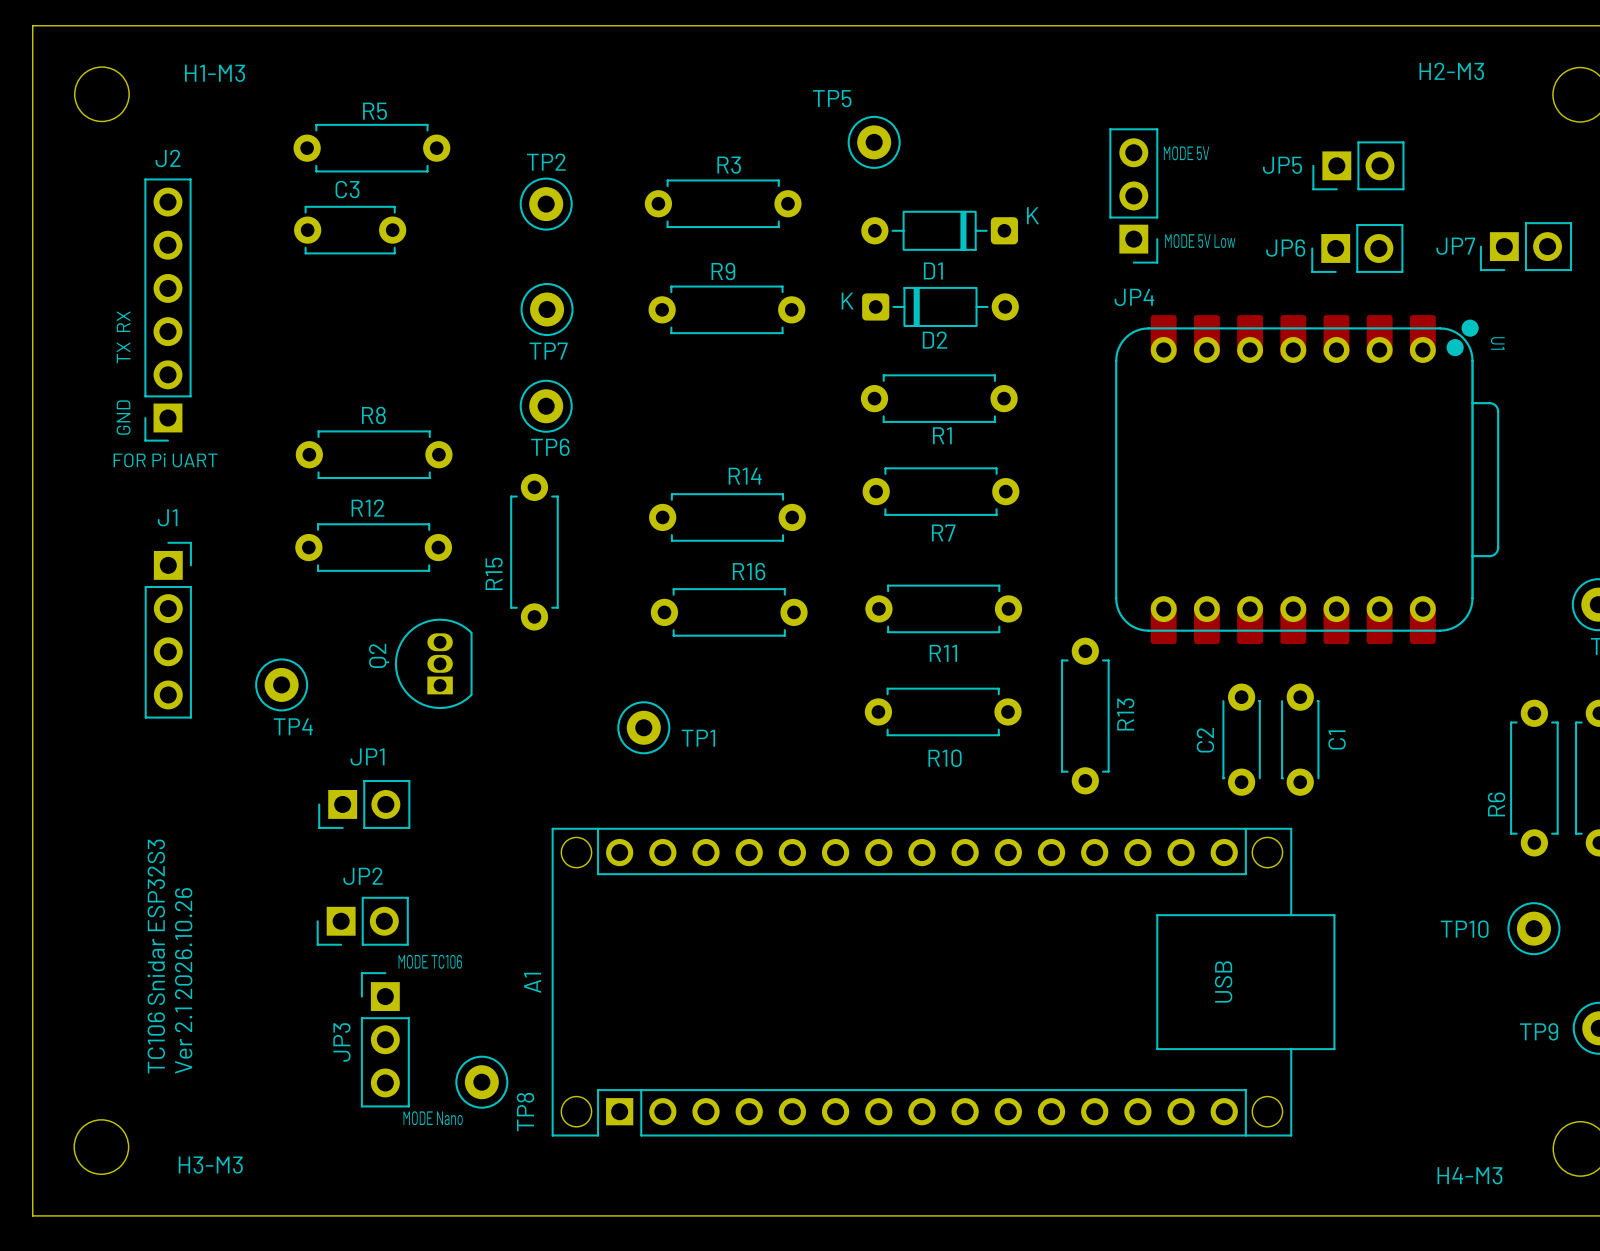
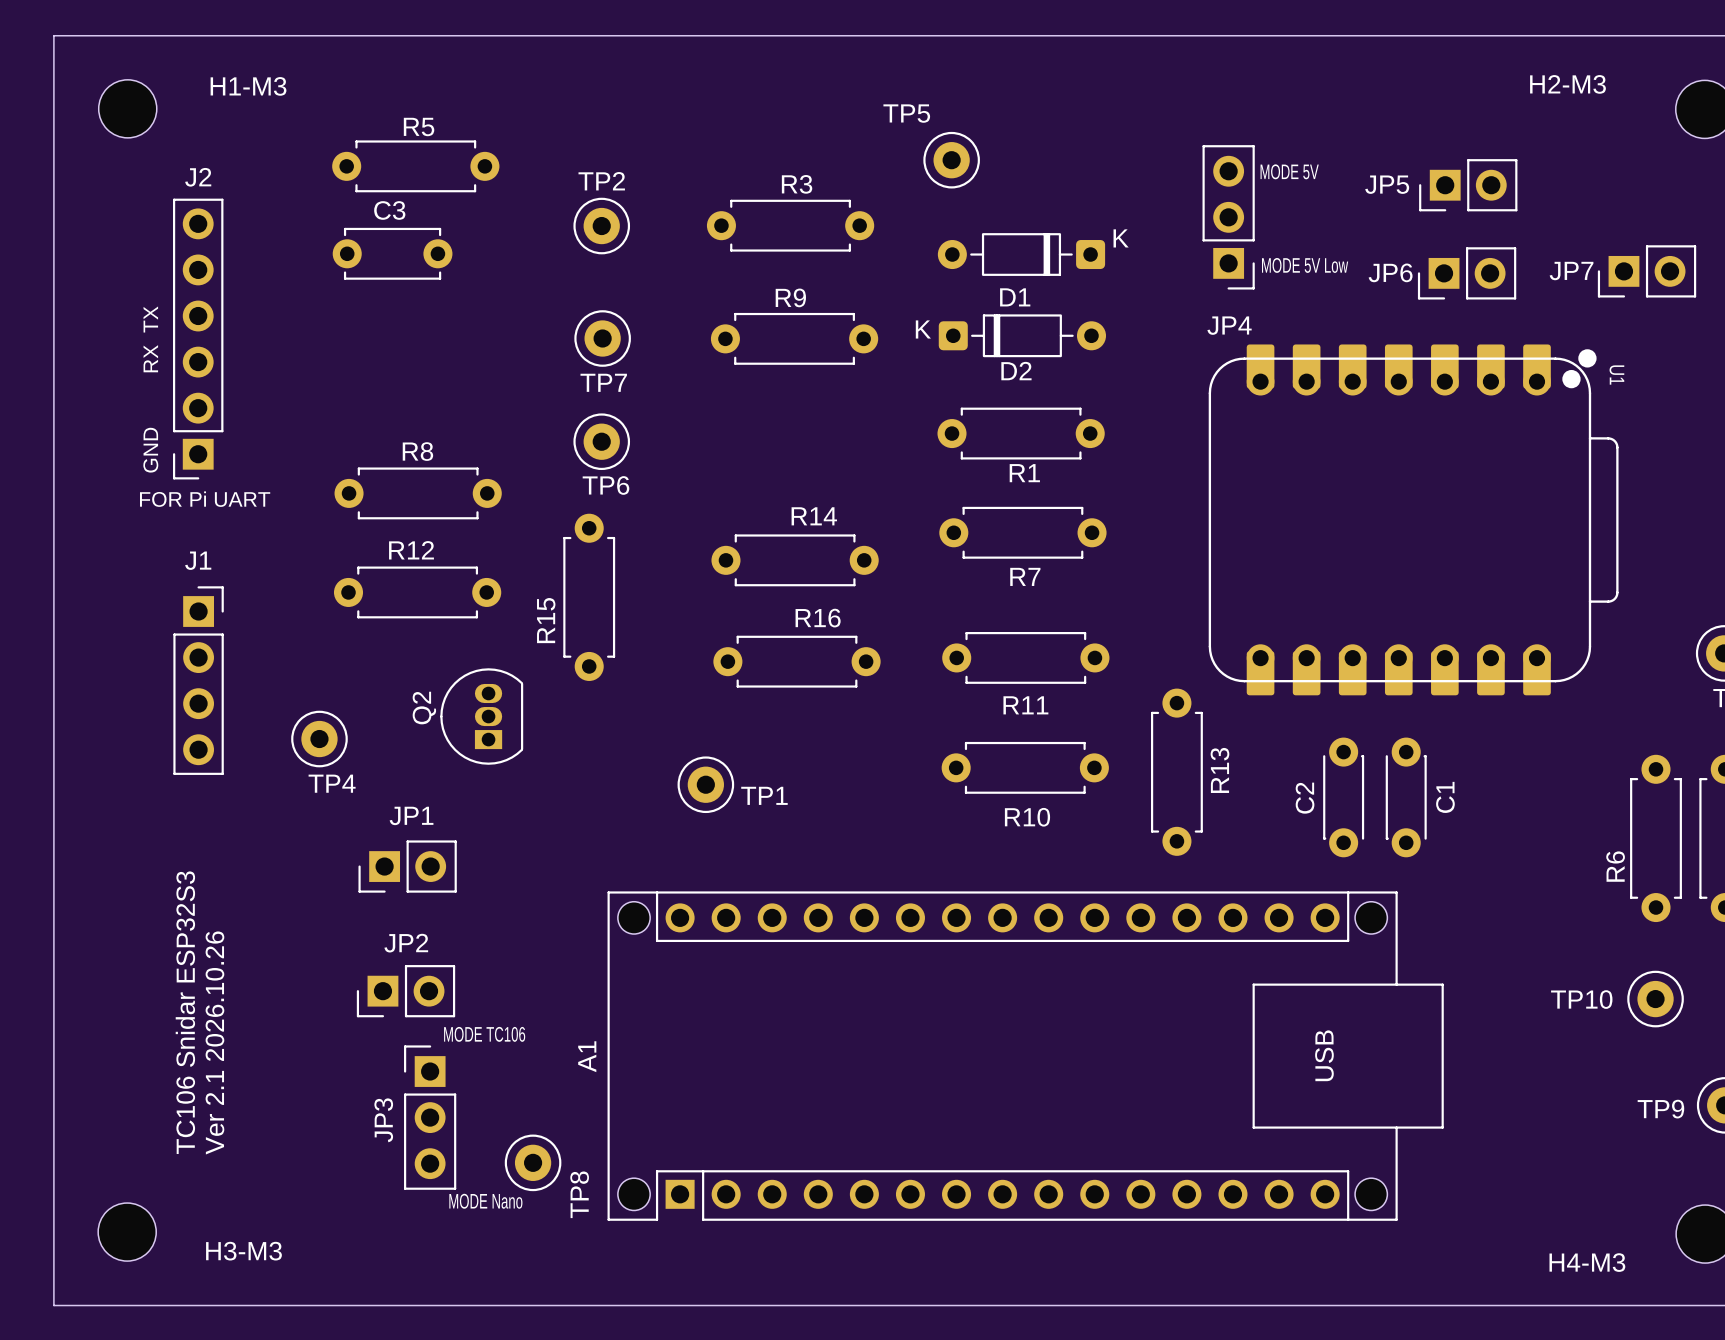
text: GND TX RX (123, 373) -> GND RX TX (150, 389)

